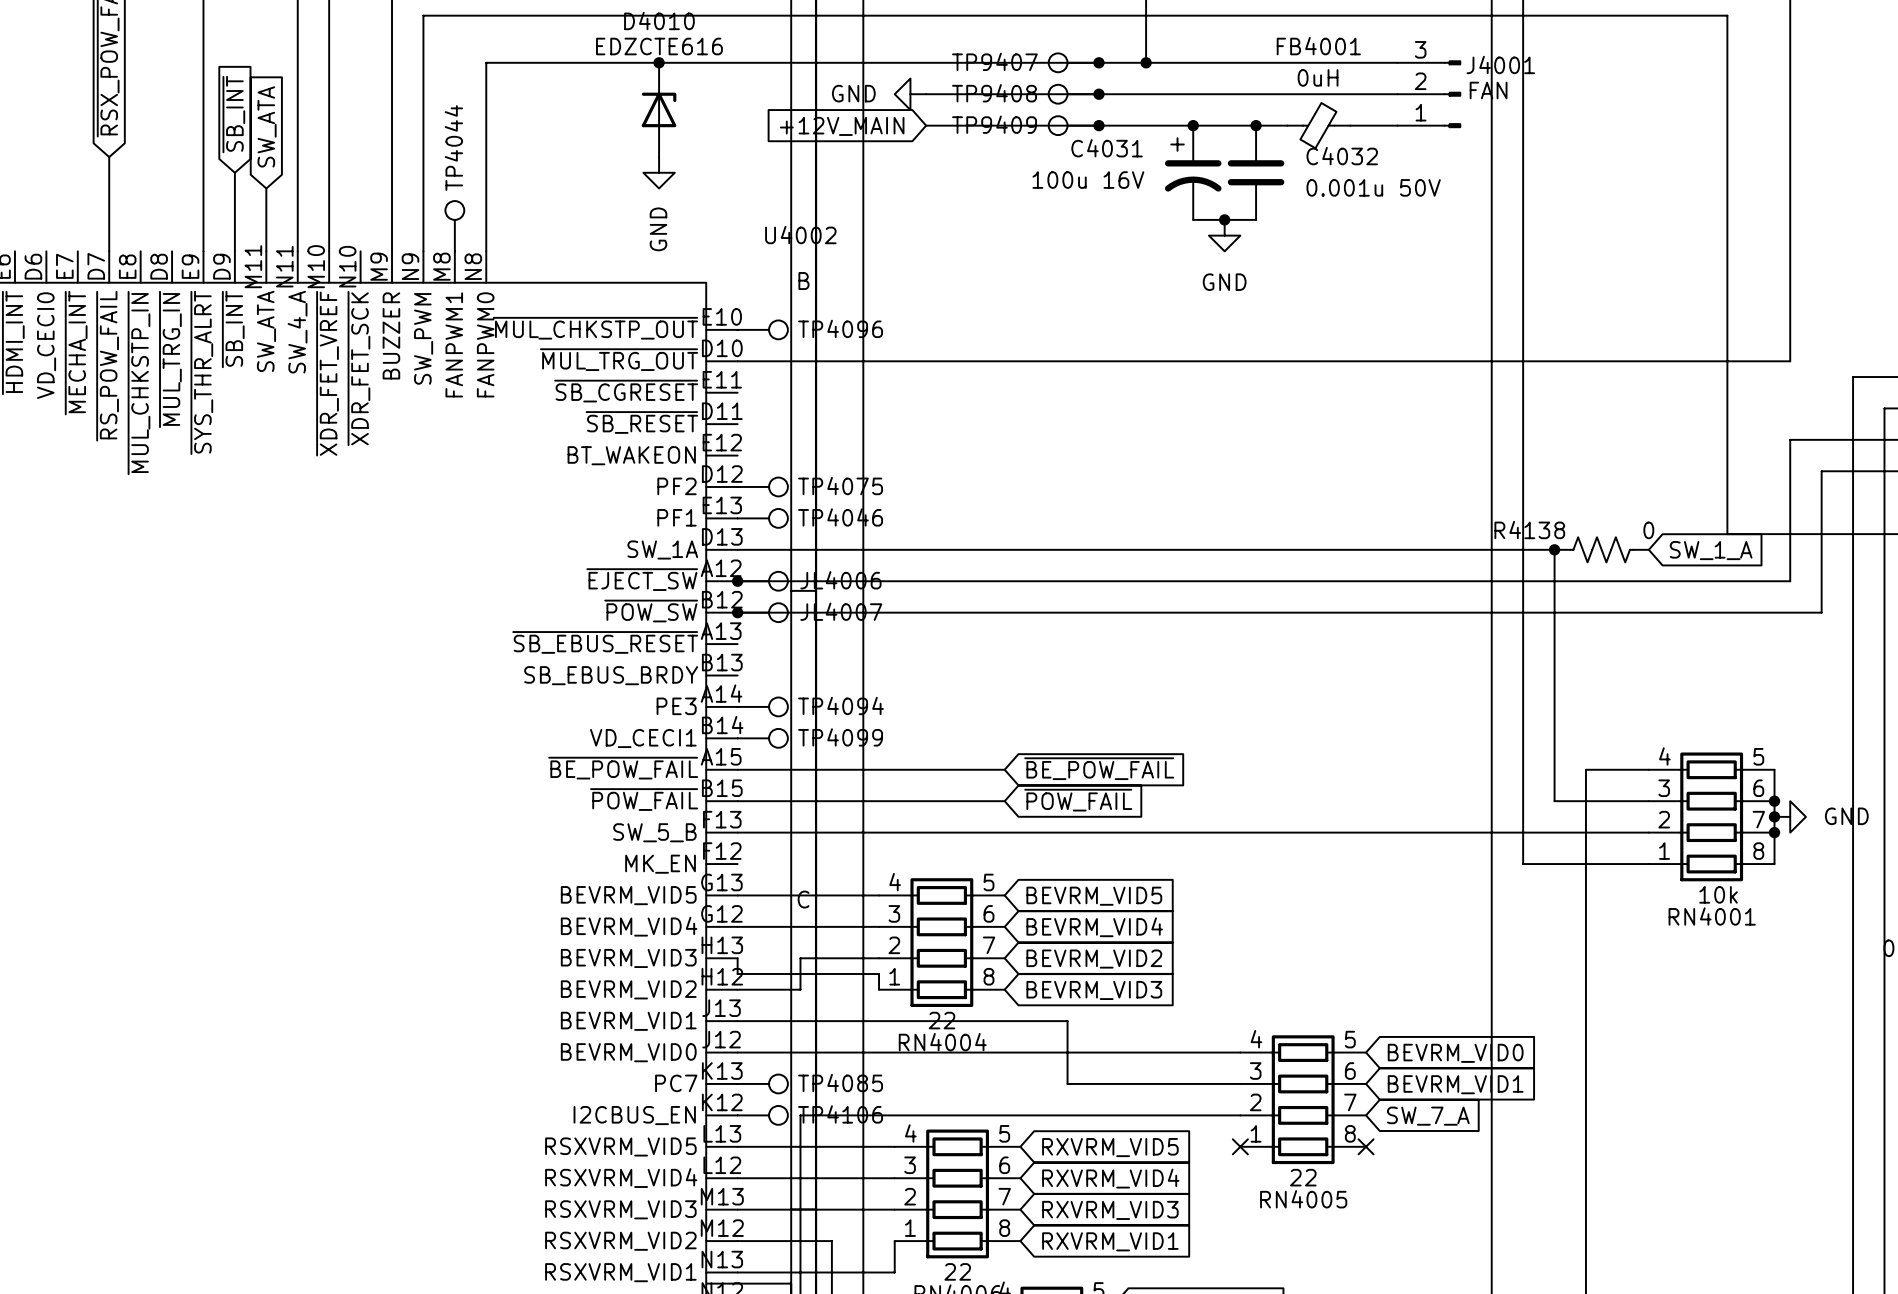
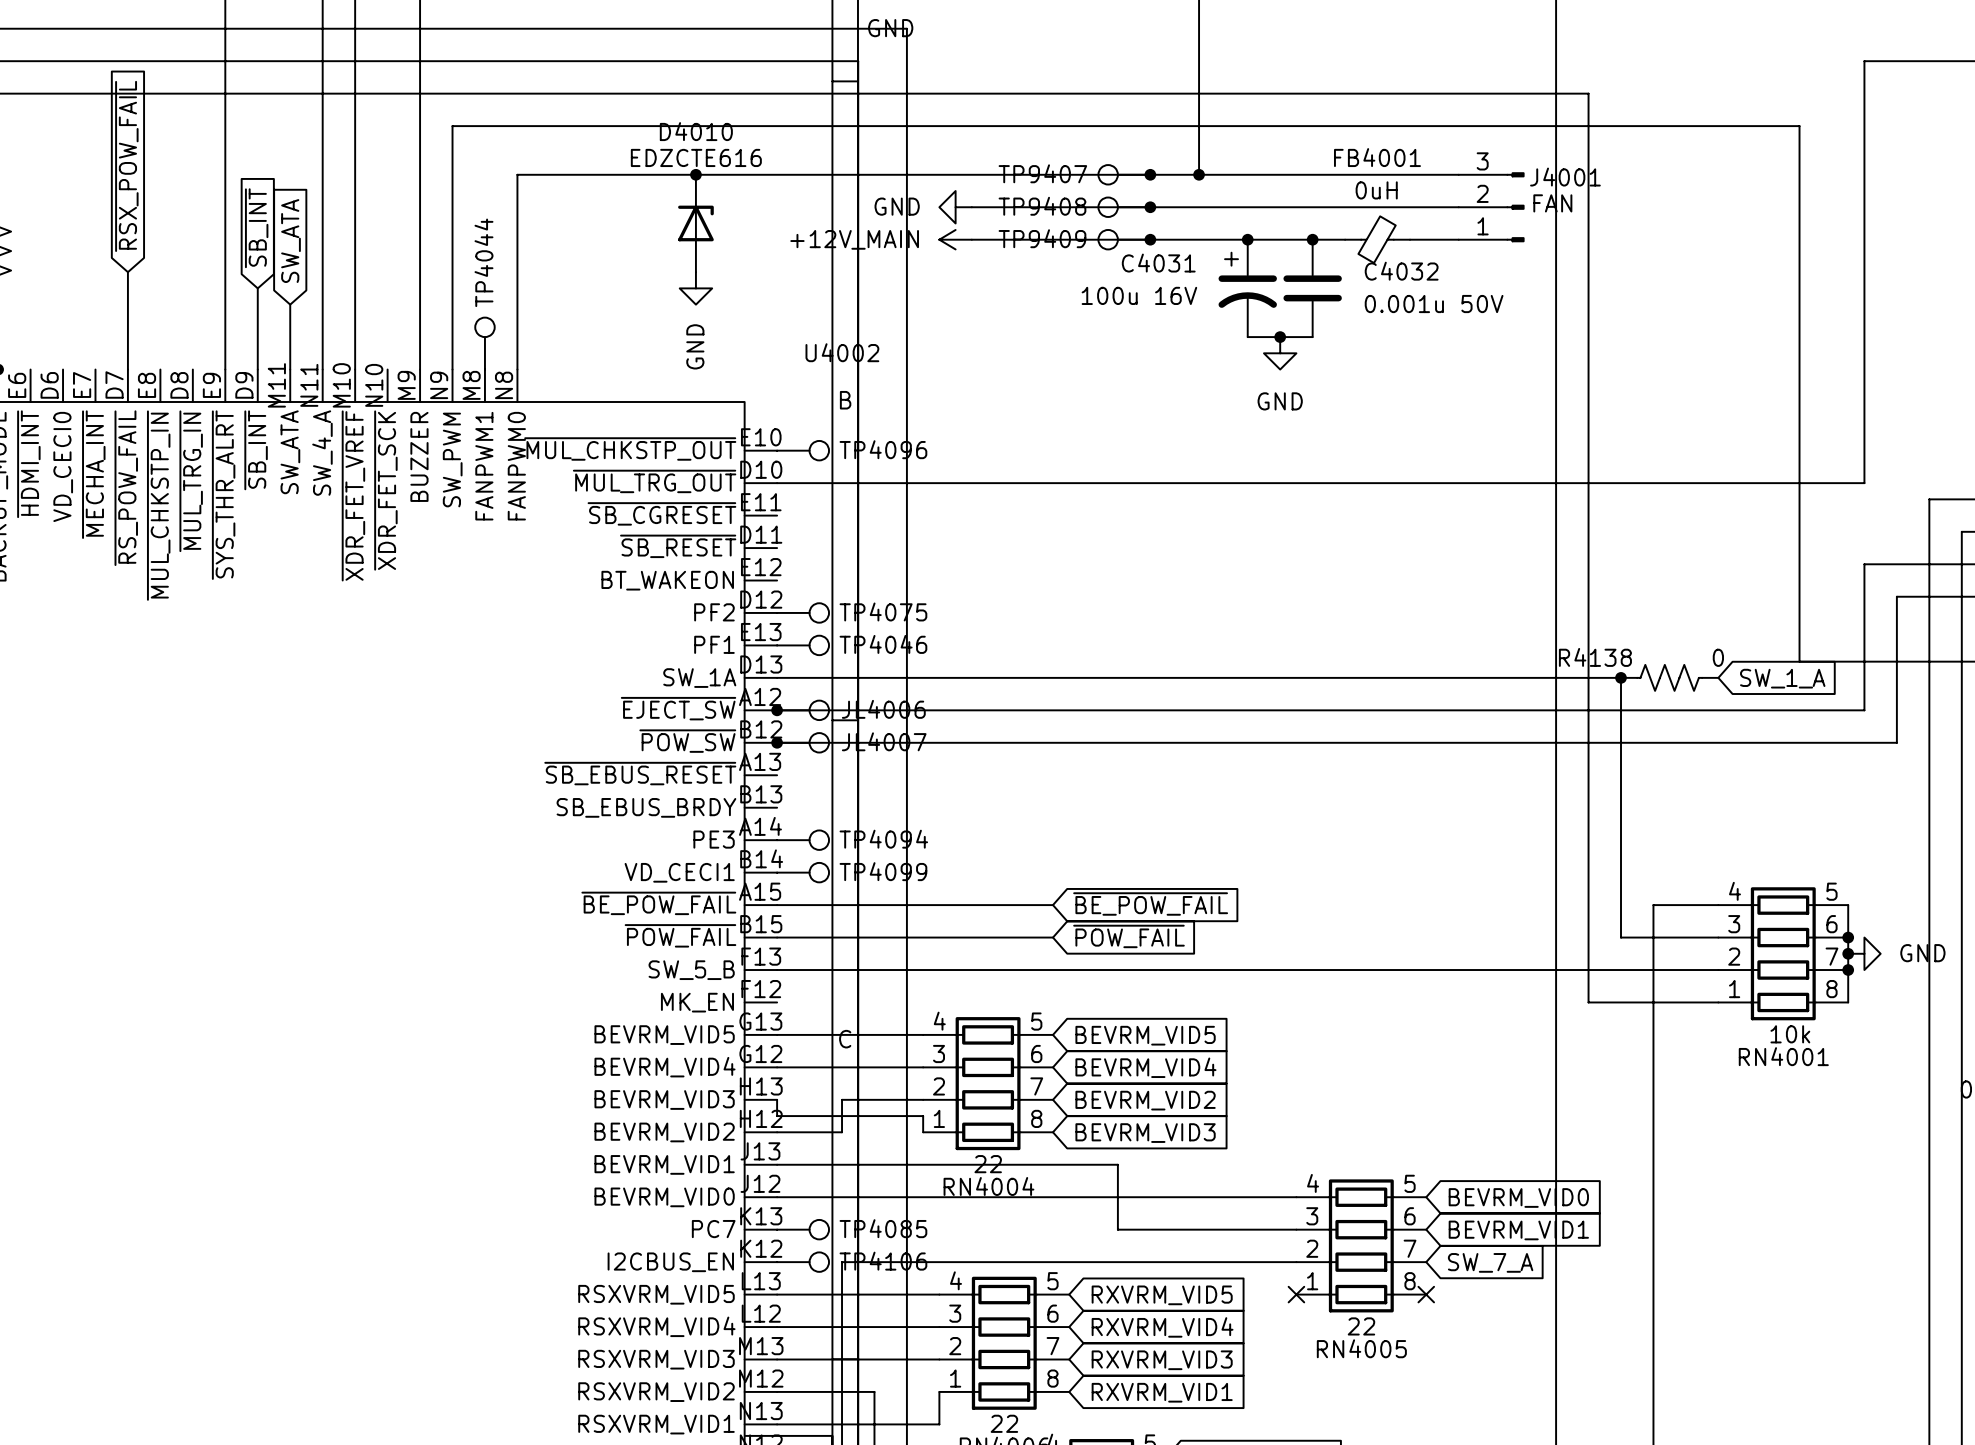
power symbol: none -> +12V_MAIN (955, 239)
global label: +12V_MAIN (842, 126) -> none

